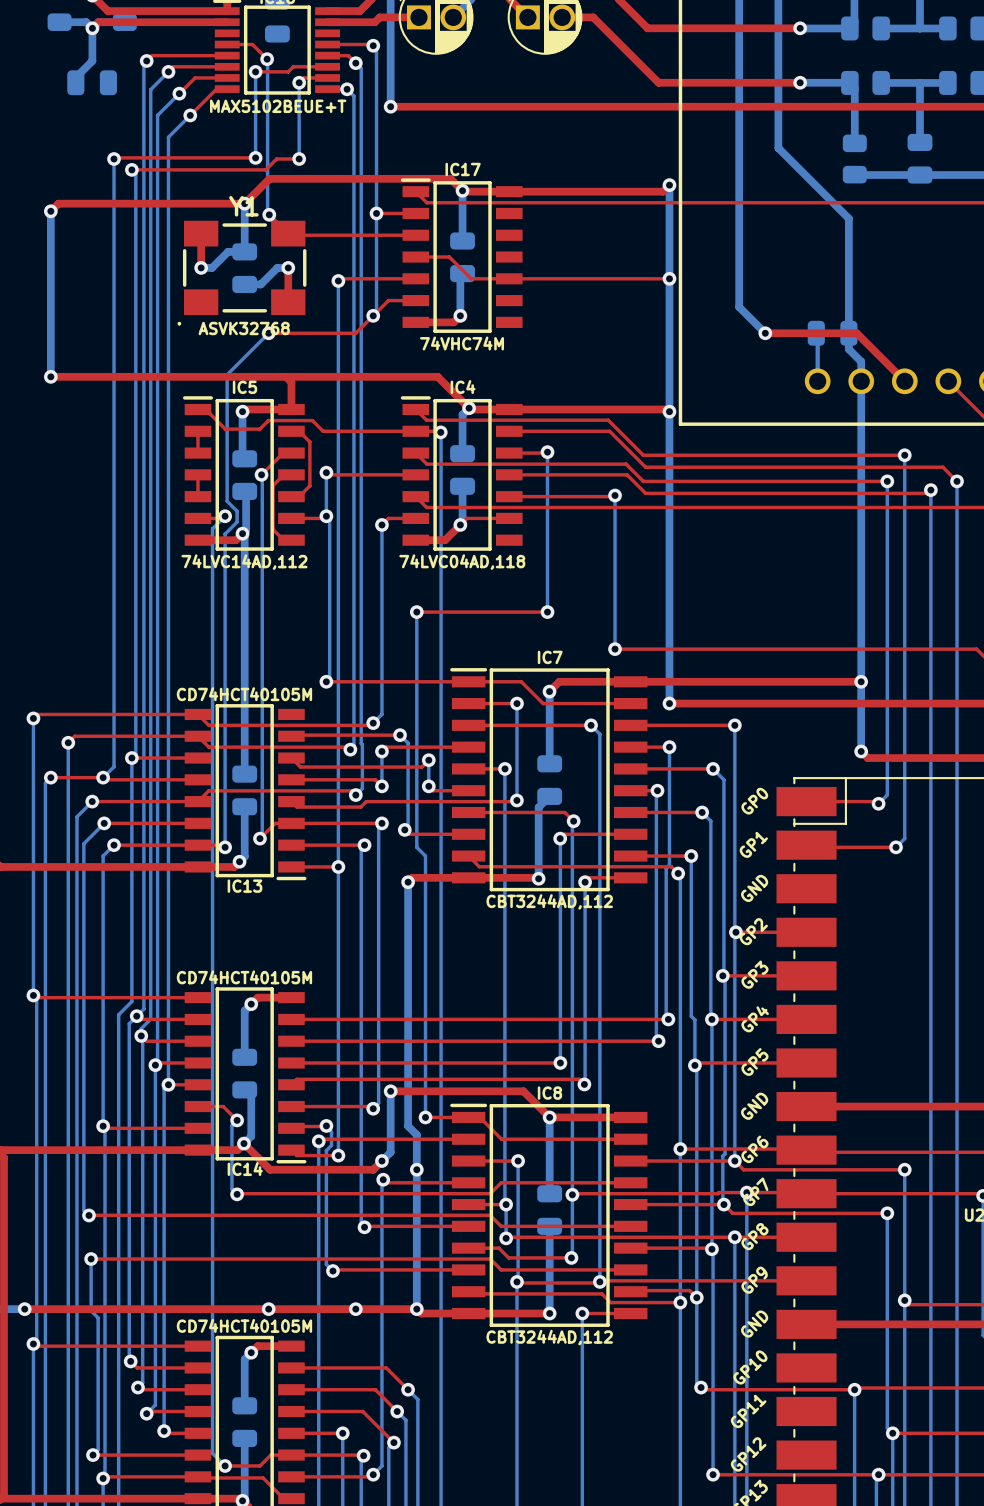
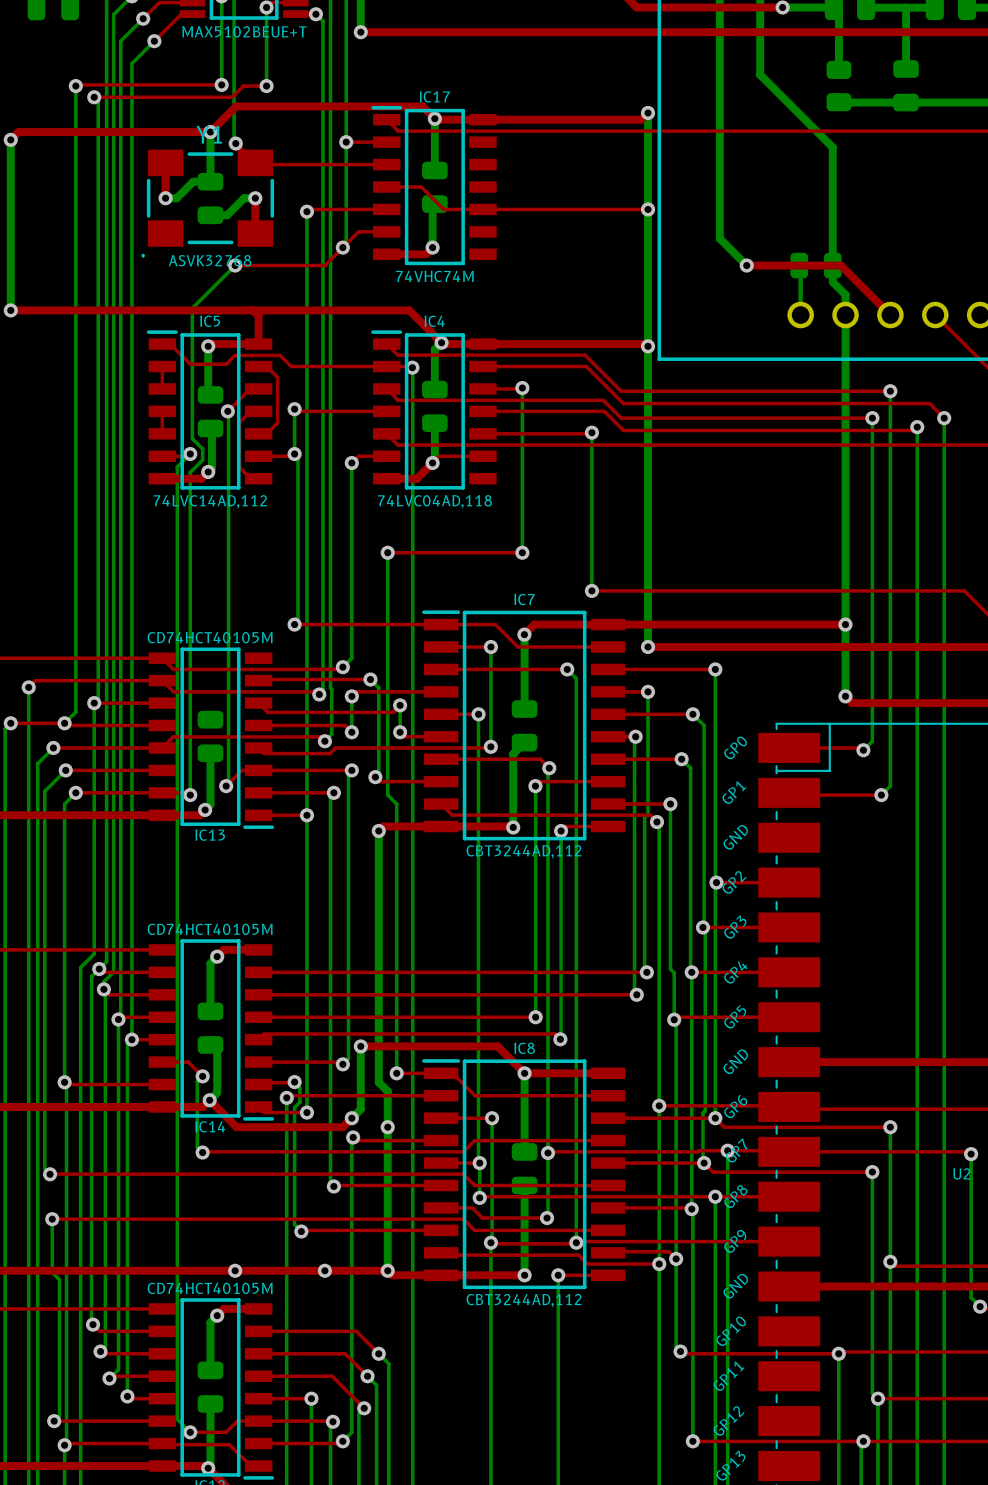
bottom track: (242, 533) (244, 535) (244, 774) -> none

